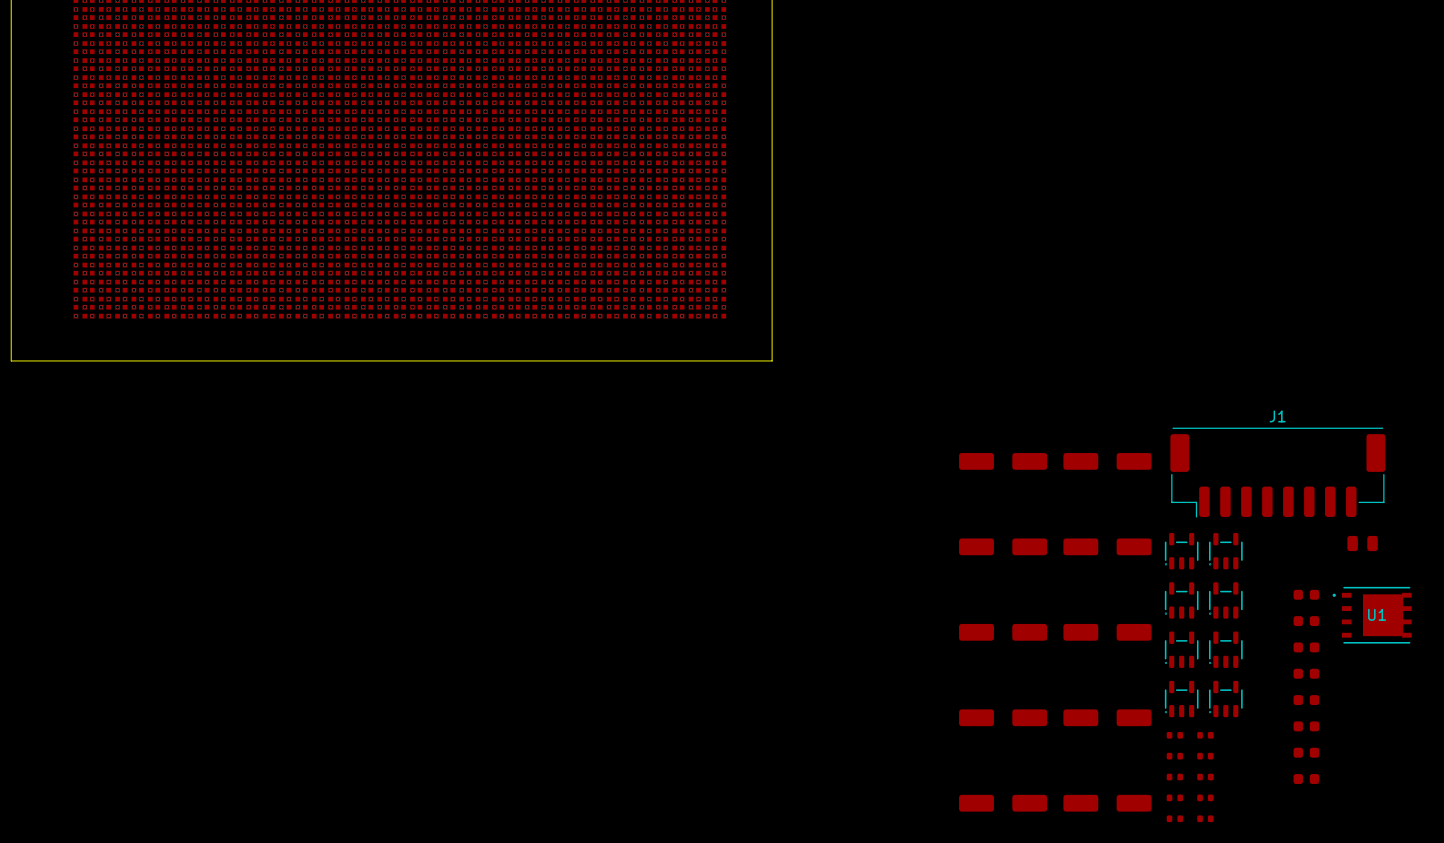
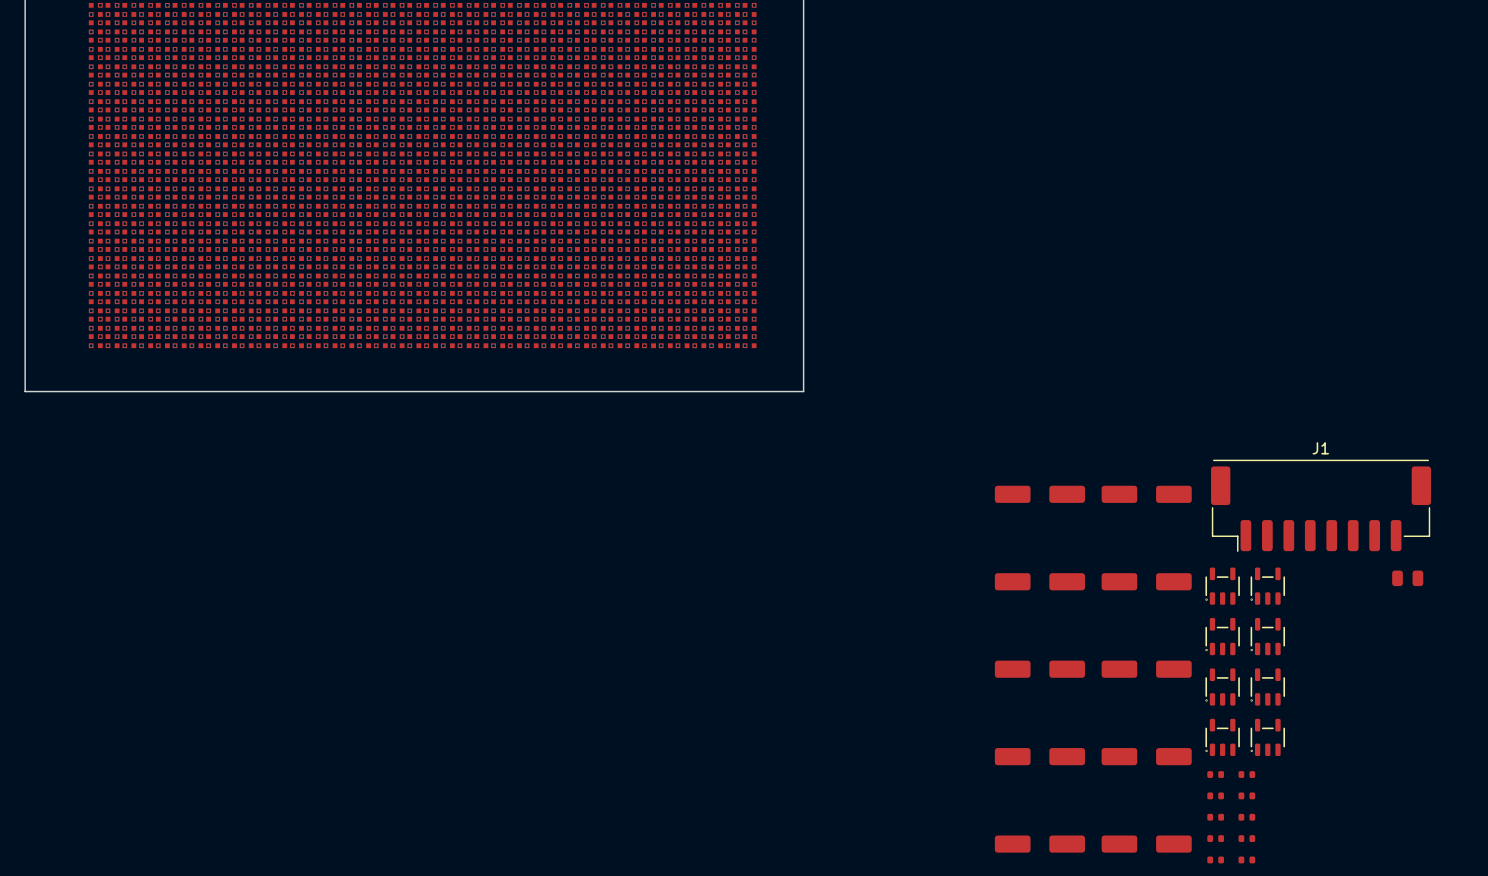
part: (1306, 594) -> none
U1: (1372, 615) -> none
part: (1306, 621) -> none
part: (1306, 647) -> none
part: (1306, 673) -> none
part: (1306, 700) -> none
part: (1306, 726) -> none
part: (1306, 752) -> none
part: (1306, 779) -> none

